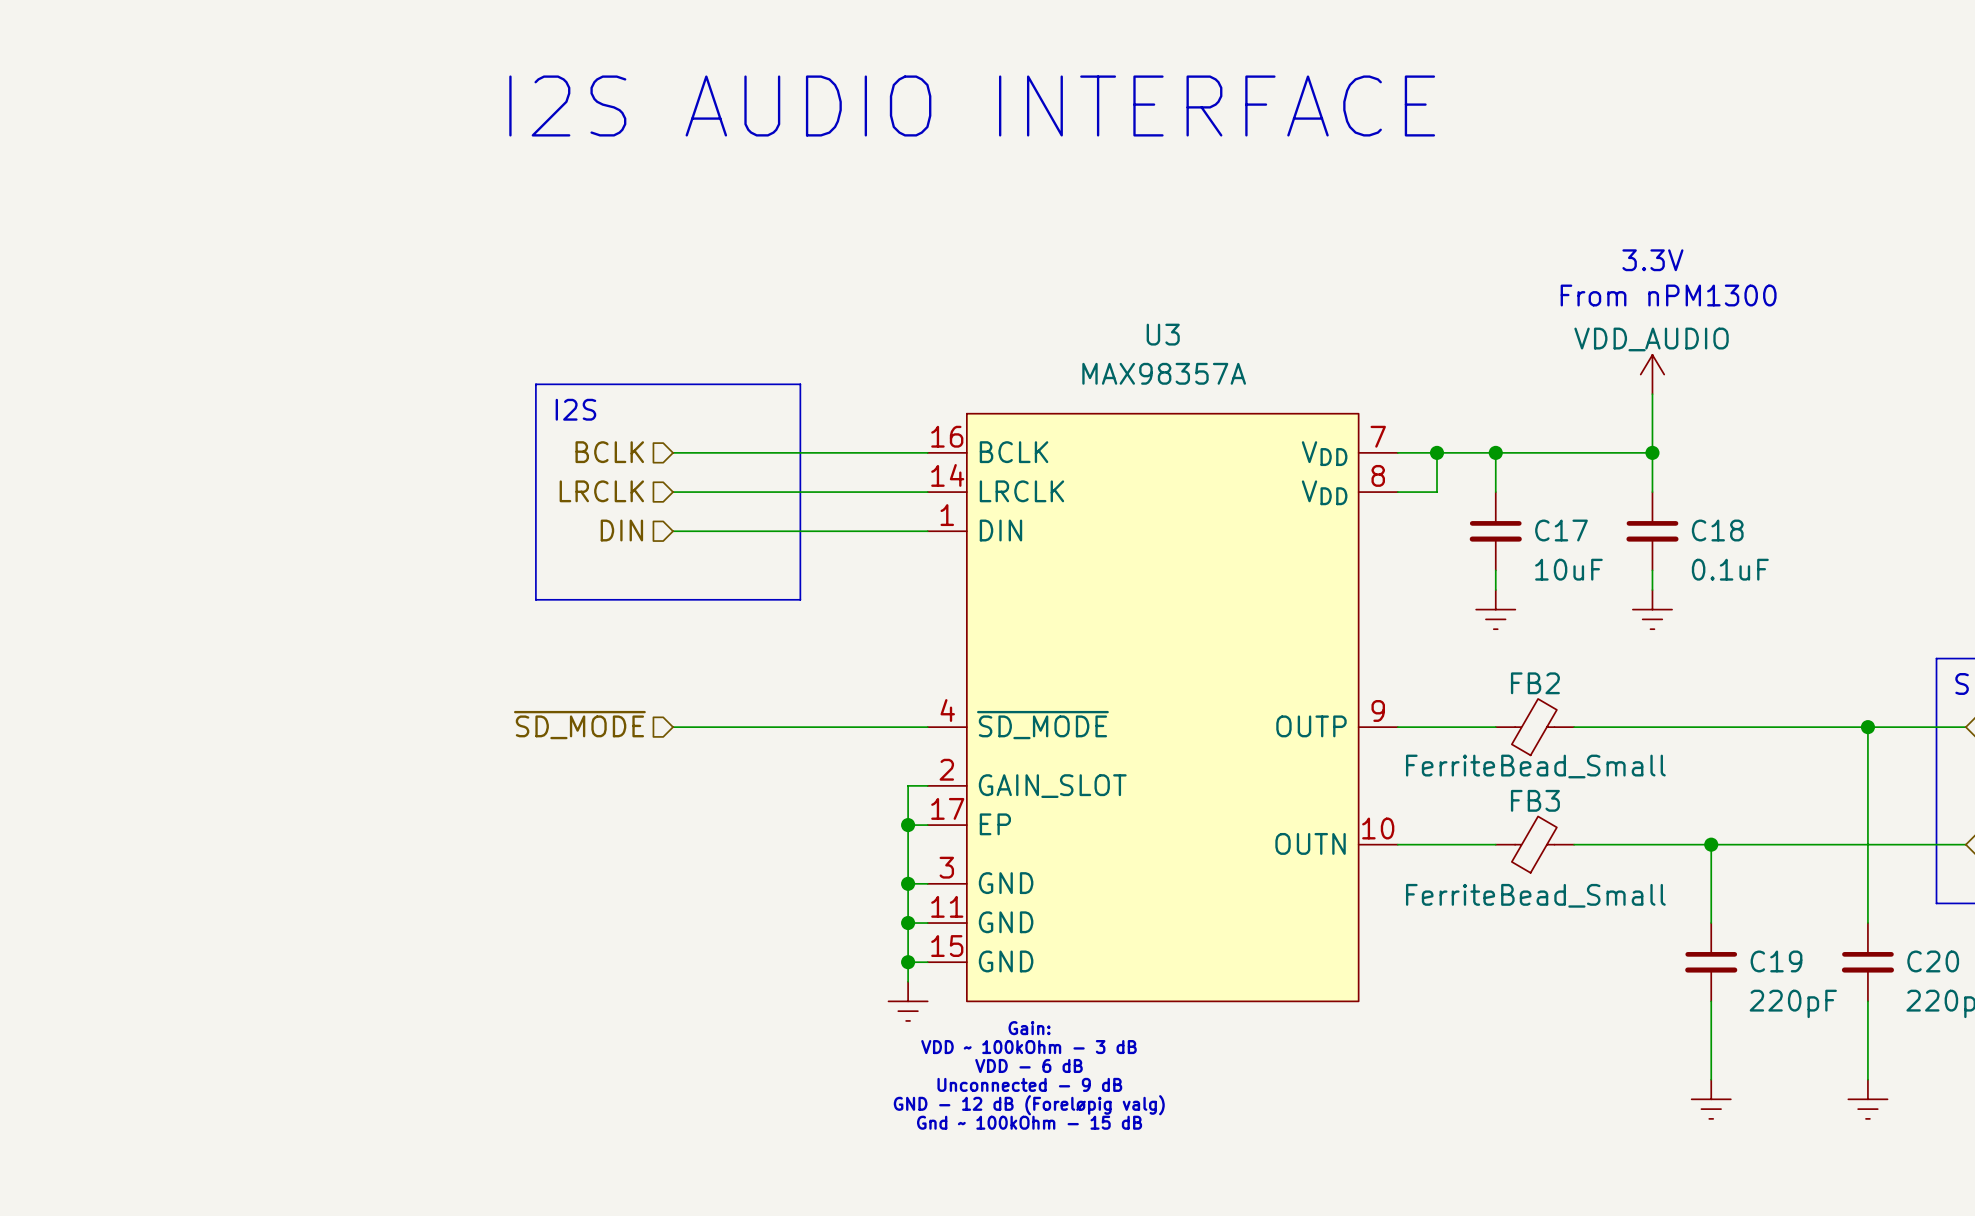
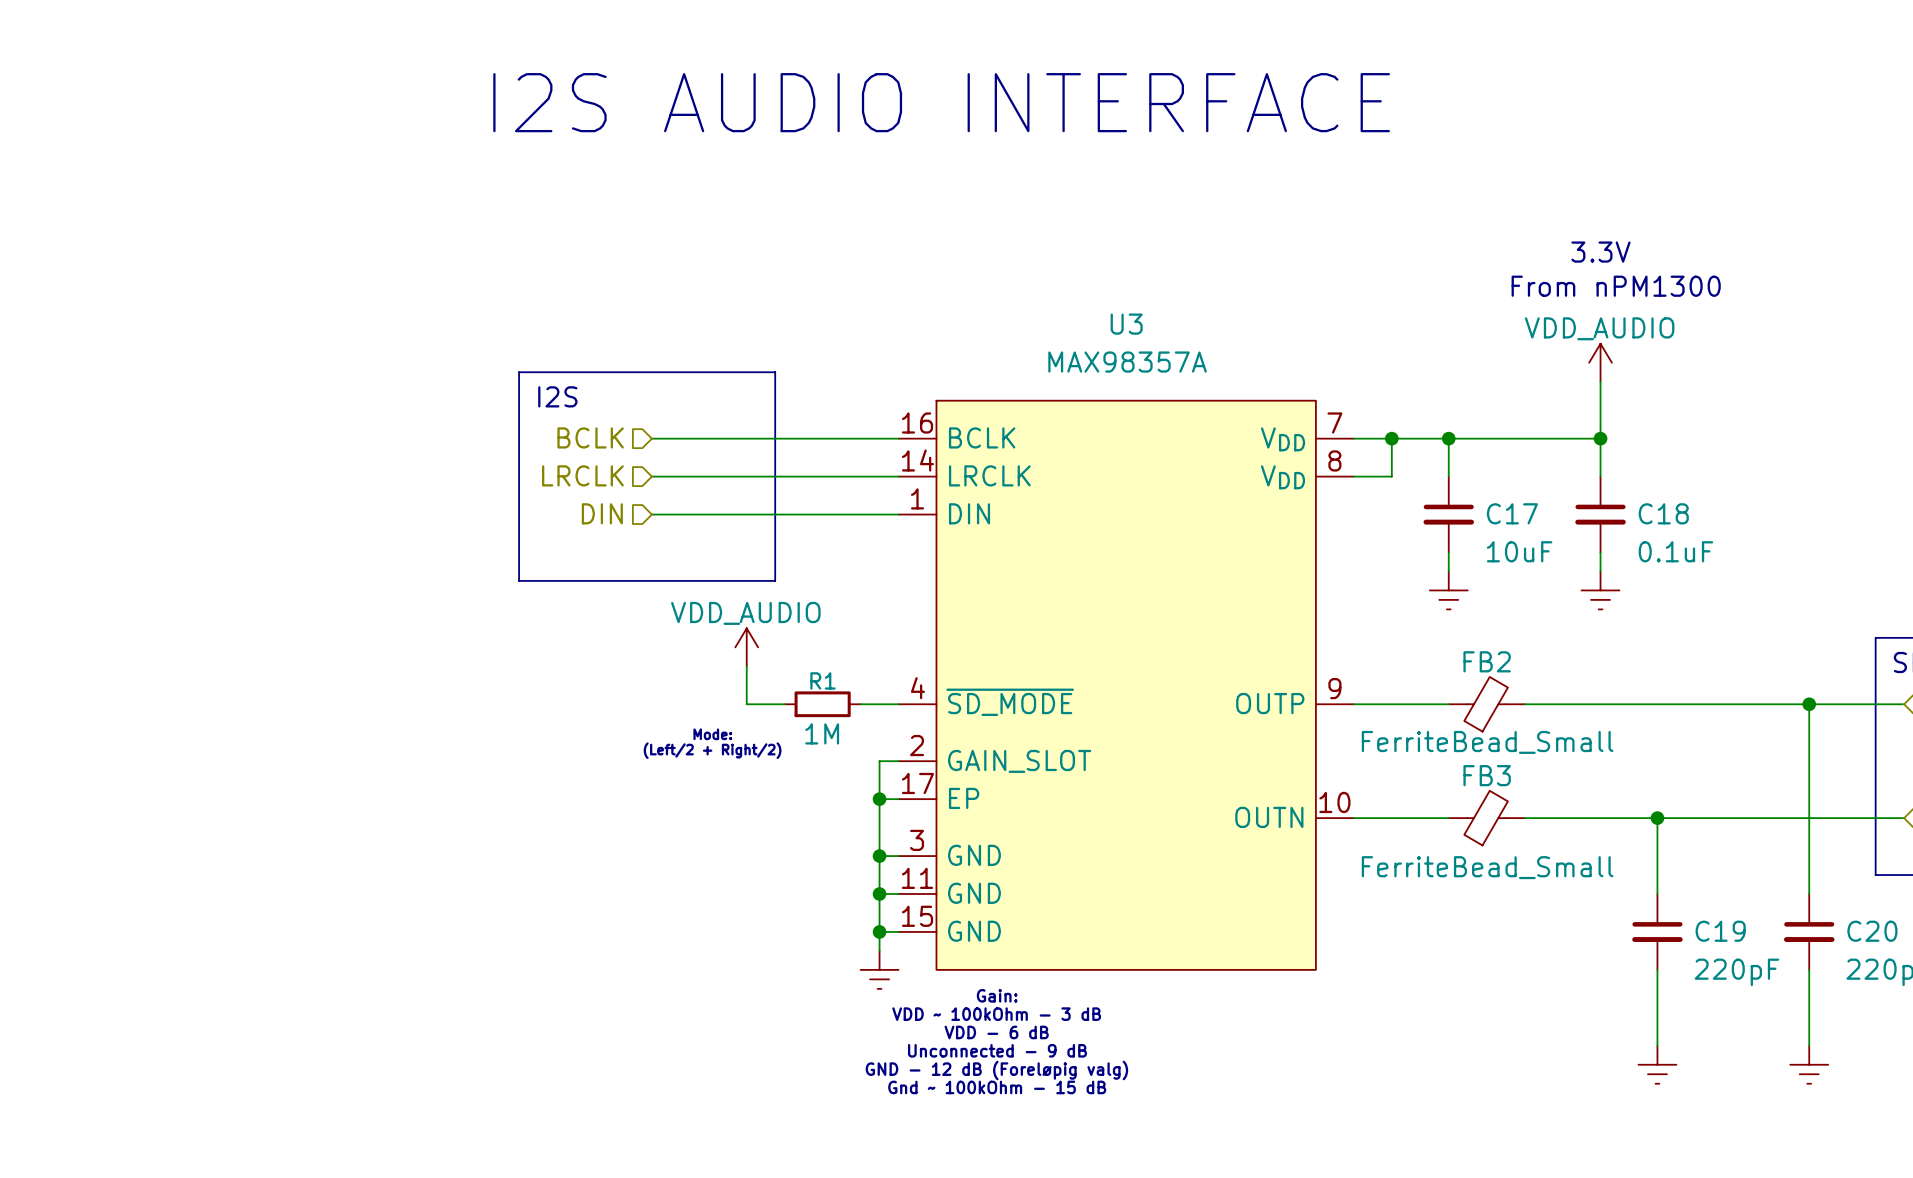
power symbol: none -> VDD_AUDIO (746, 647)
hierarchical label: ~{SD_MODE} (579, 725) -> none
wire: (673, 727) (770, 727) -> (746, 666) (746, 704)
wire: (810, 727) (888, 727) -> none
R1: none -> 1M (822, 704)
text: none -> Mode: (712, 734)
text: none -> (Left/2 + Right/2) (712, 750)

